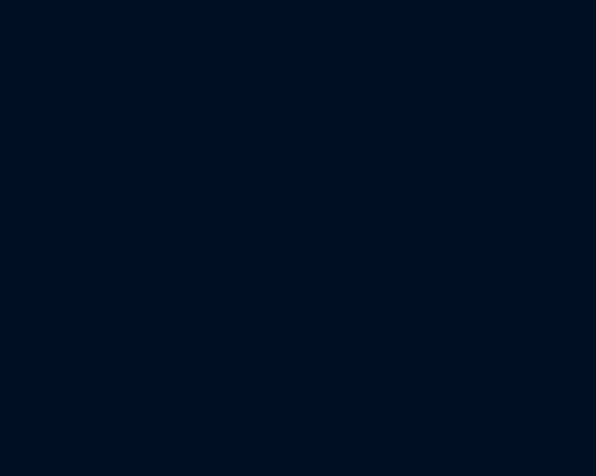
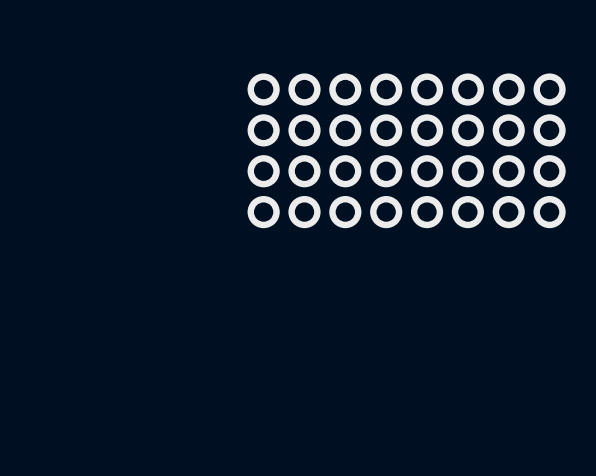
via: none -> (263, 89)
via: none -> (304, 89)
via: none -> (345, 89)
via: none -> (386, 89)
via: none -> (427, 89)
via: none -> (467, 89)
via: none -> (508, 89)
via: none -> (549, 89)
via: none -> (263, 130)
via: none -> (304, 130)
via: none -> (345, 130)
via: none -> (386, 130)
via: none -> (427, 130)
via: none -> (467, 130)
via: none -> (508, 130)
via: none -> (549, 130)
via: none -> (263, 171)
via: none -> (304, 171)
via: none -> (345, 171)
via: none -> (386, 171)
via: none -> (427, 171)
via: none -> (467, 171)
via: none -> (508, 171)
via: none -> (549, 171)
via: none -> (263, 212)
via: none -> (304, 212)
via: none -> (345, 212)
via: none -> (386, 212)
via: none -> (427, 212)
via: none -> (467, 212)
via: none -> (508, 212)
via: none -> (549, 212)

